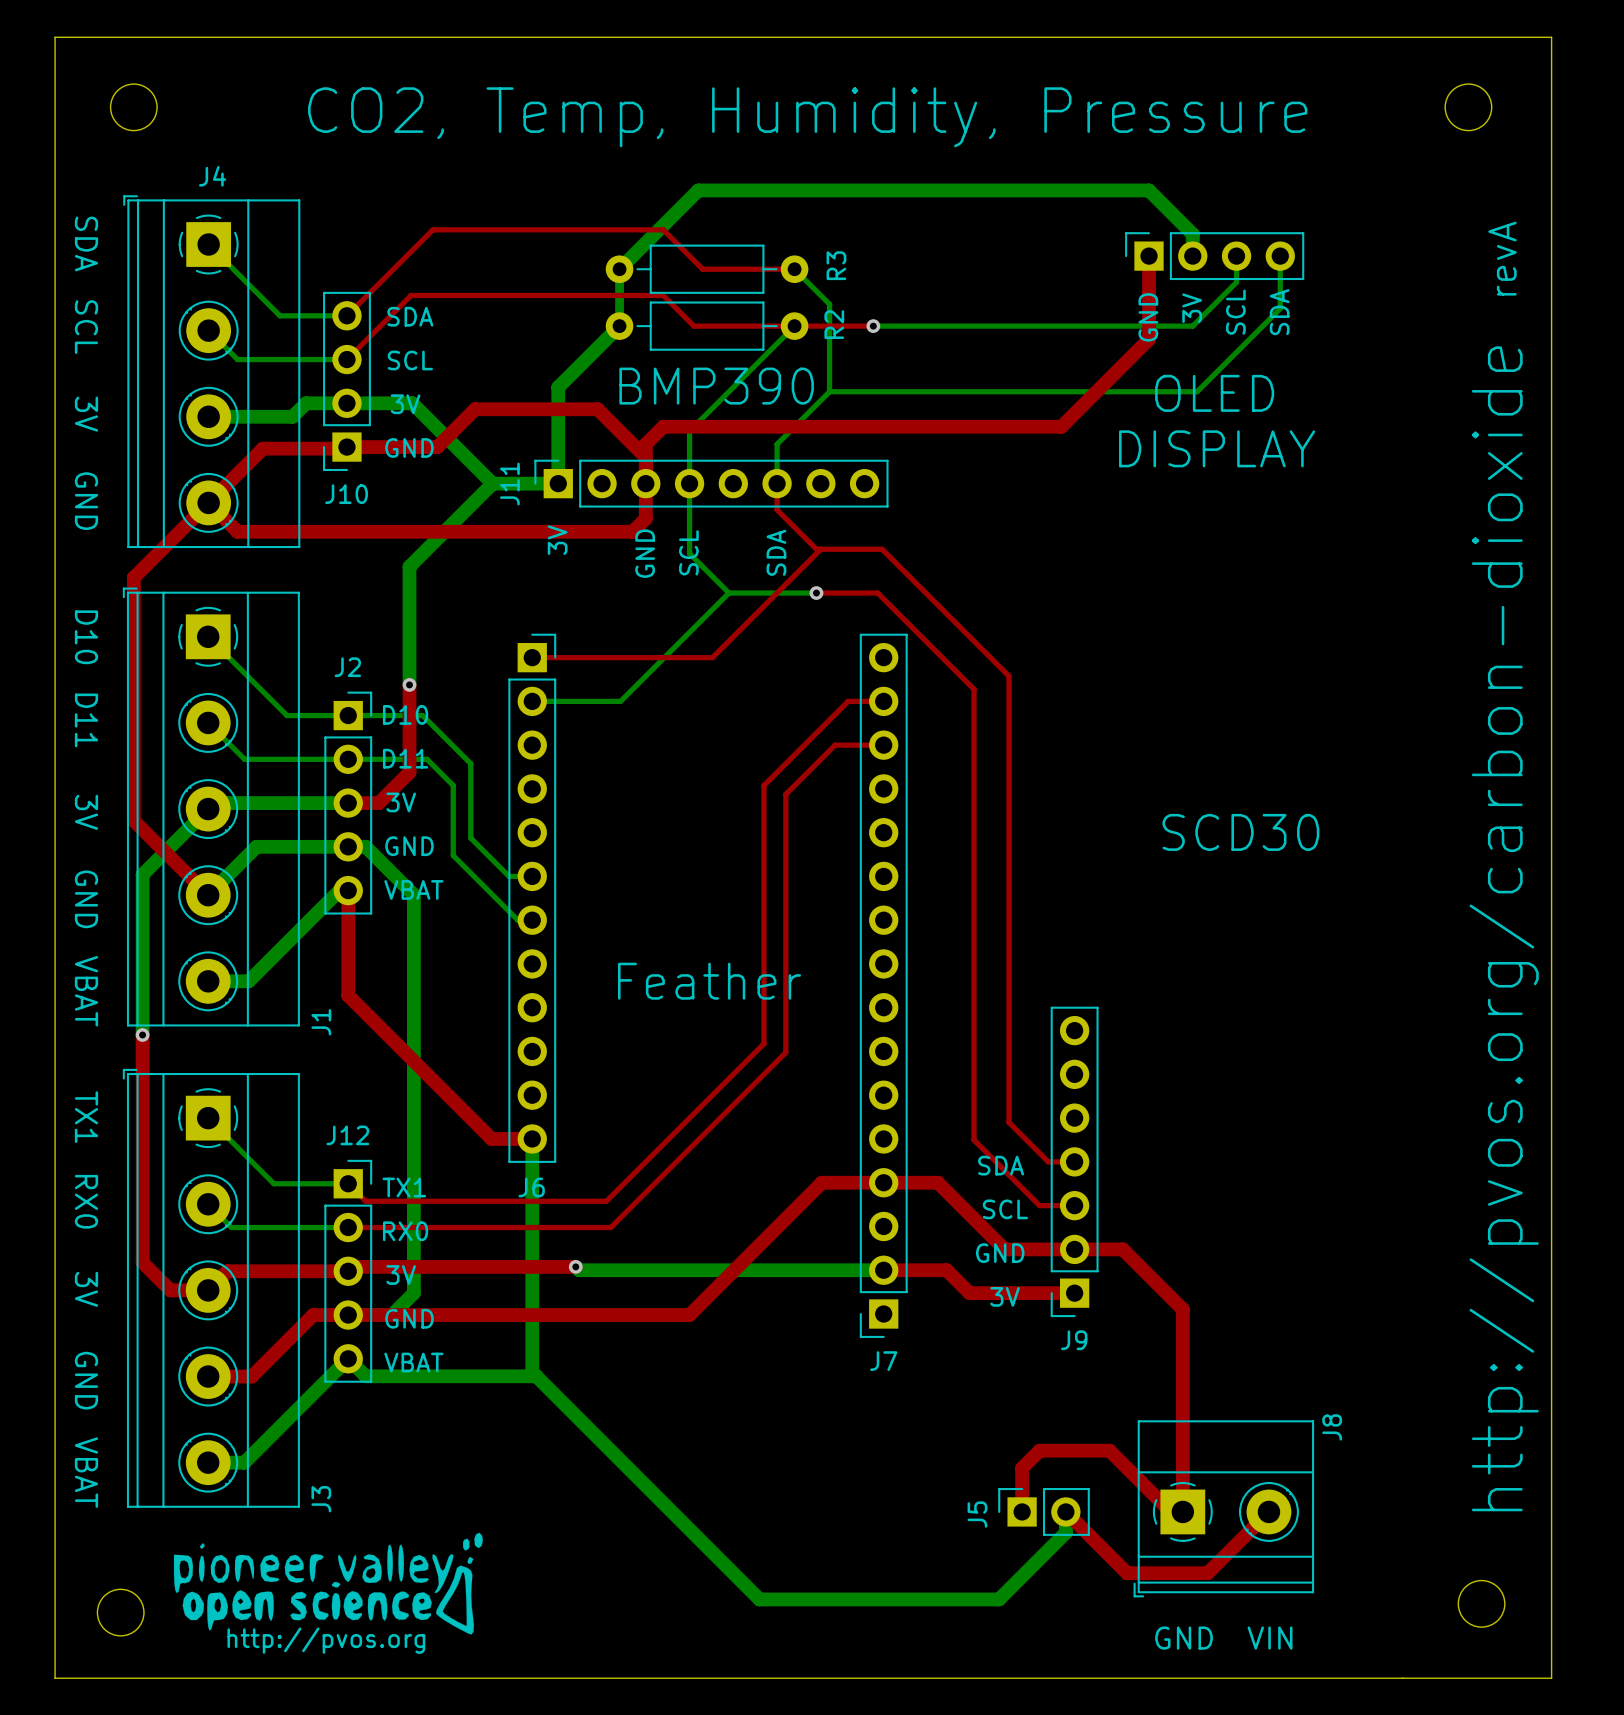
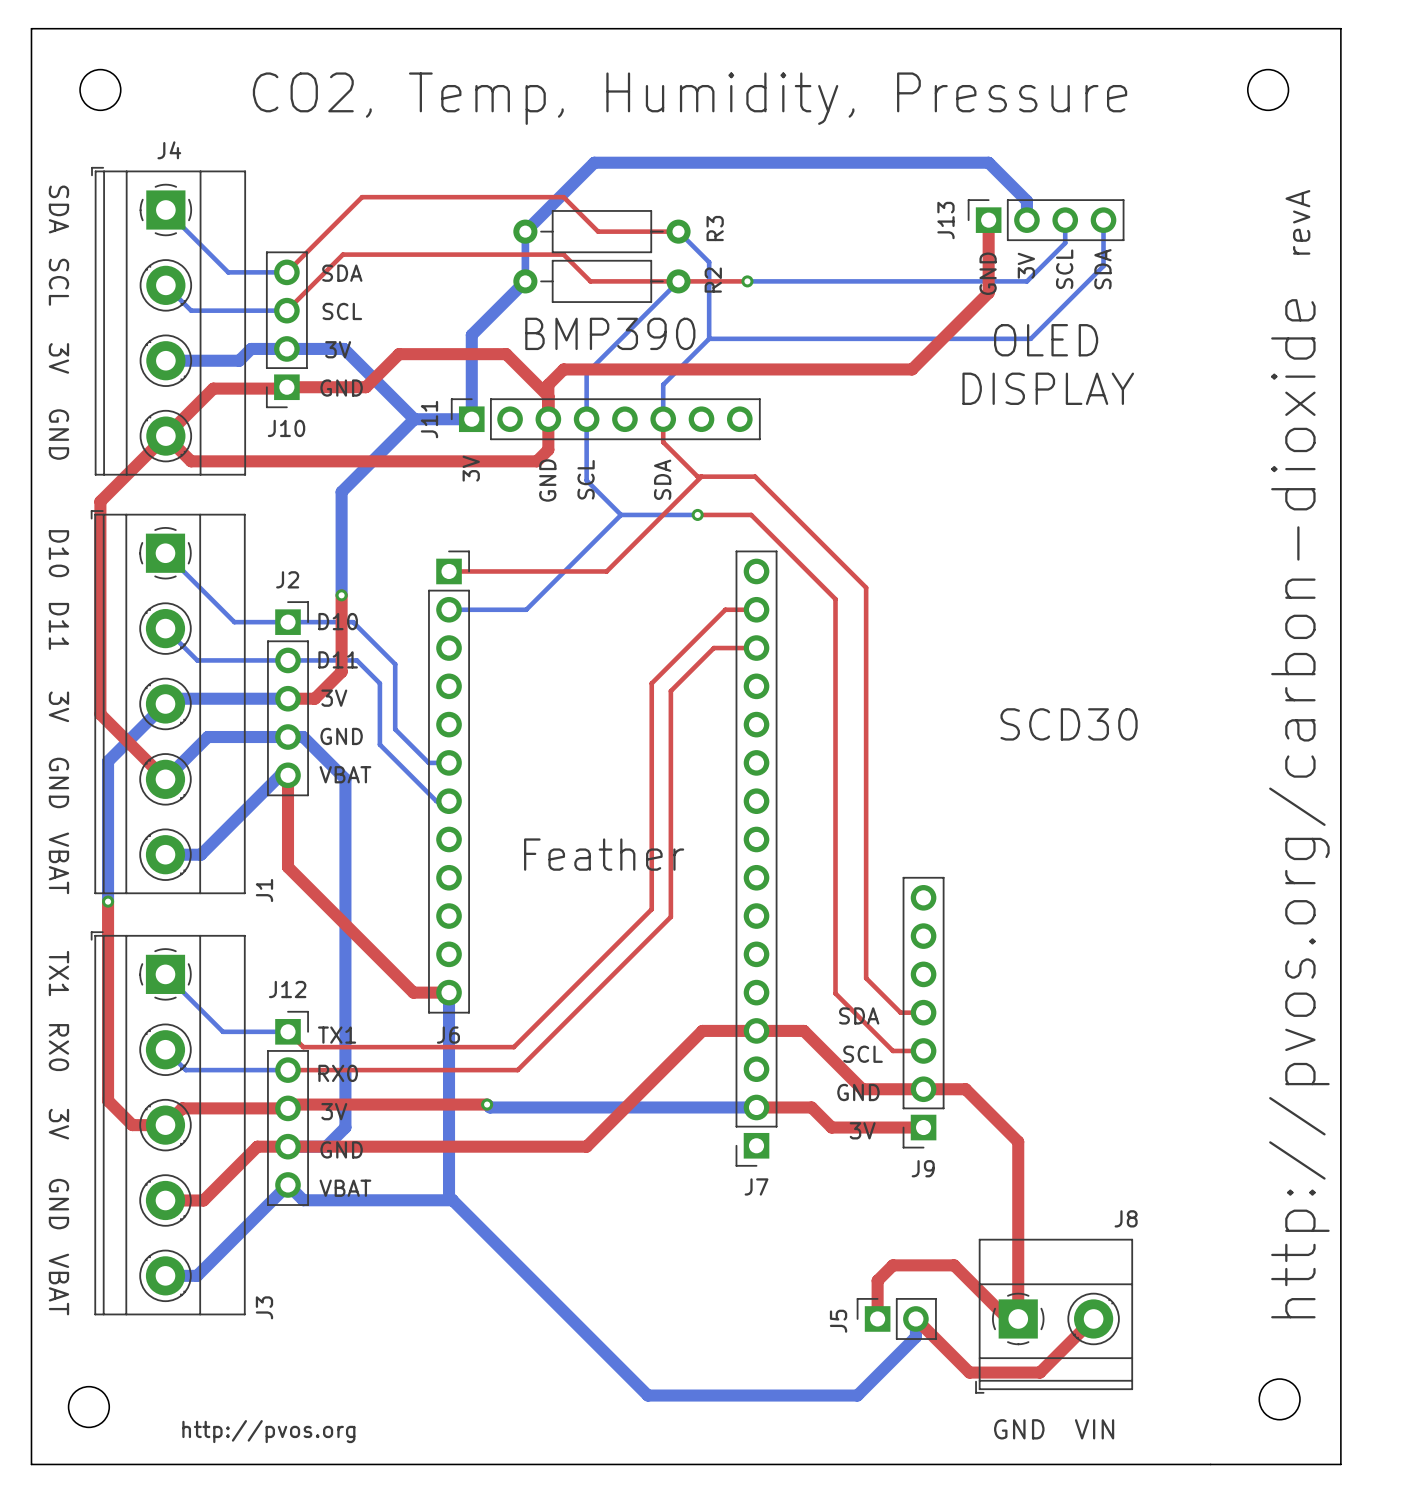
J13 name: none -> J13 (945, 220)
J8 name rotation: 0° (1332, 1427) -> 90° clockwise (1126, 1218)
drawing: [173, 1532, 483, 1635] -> none

